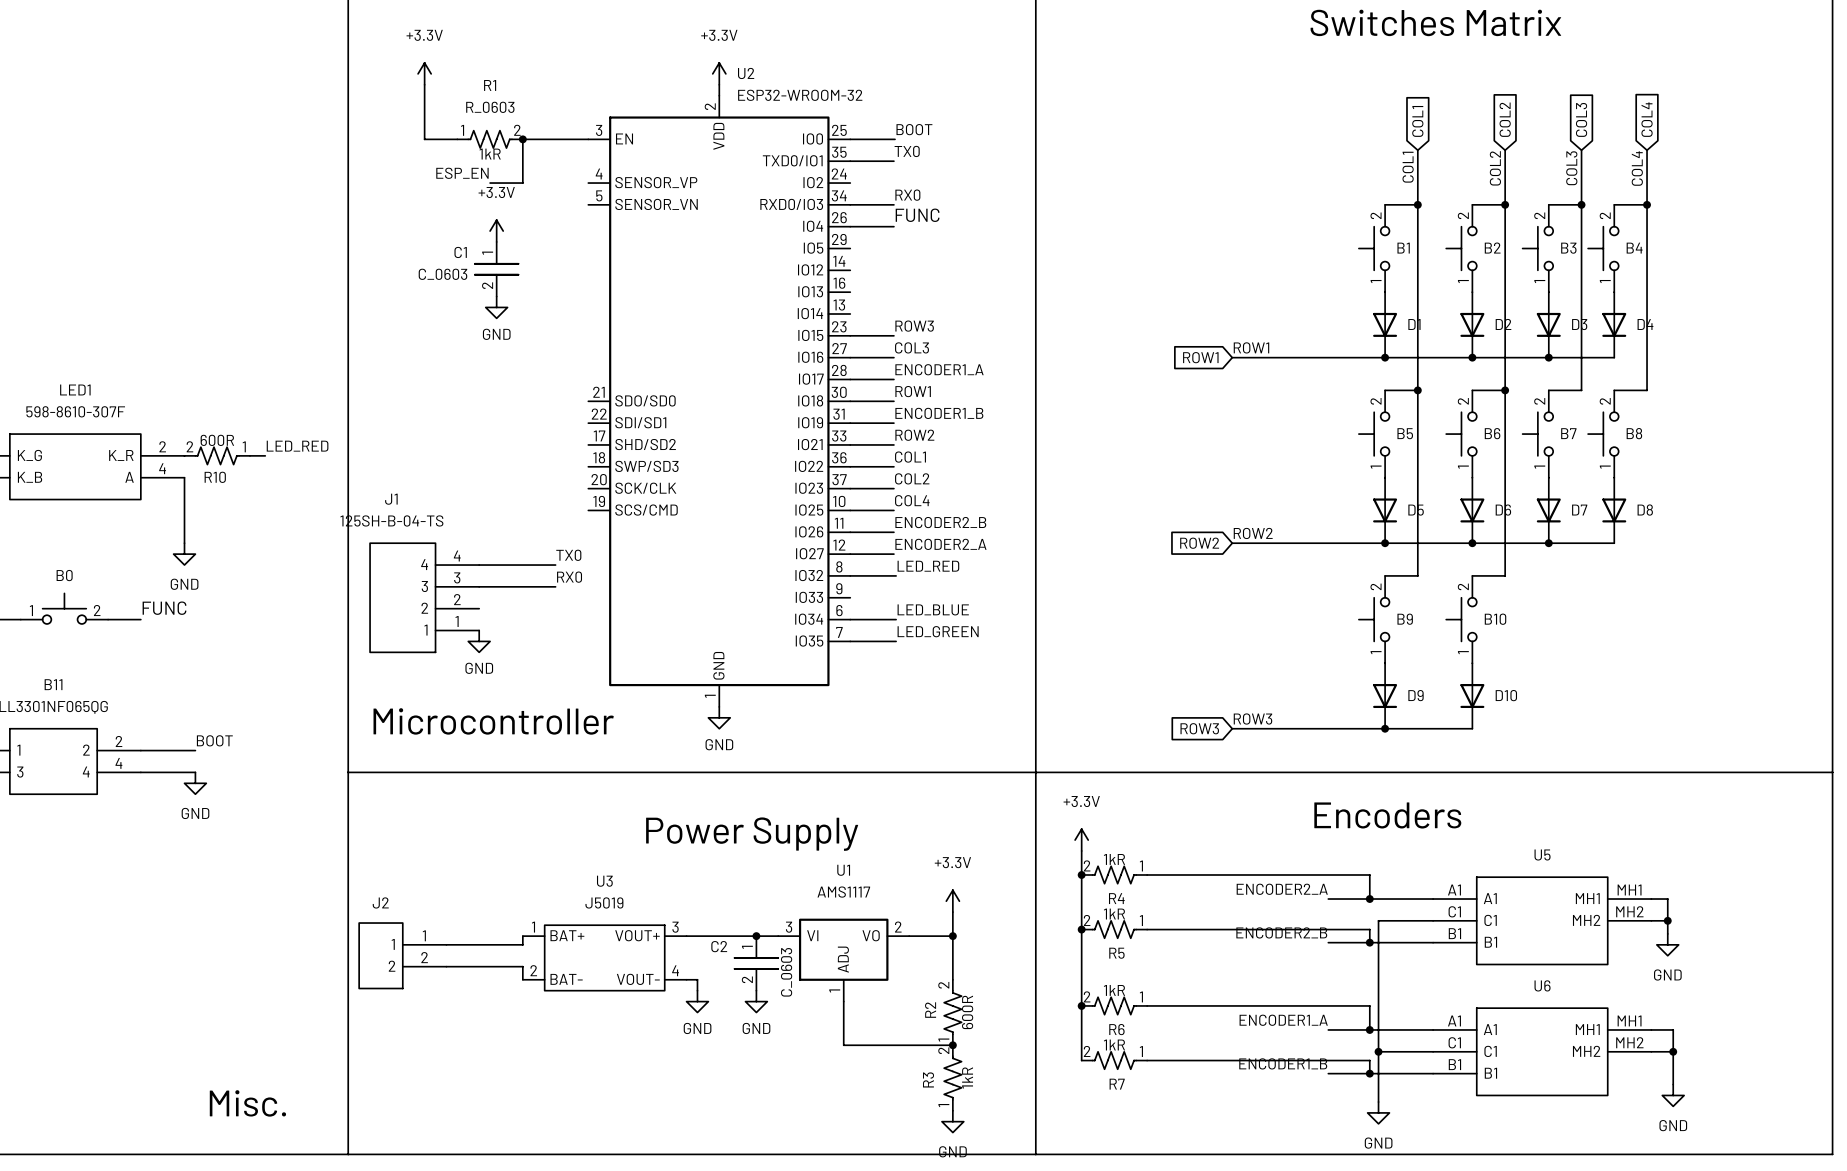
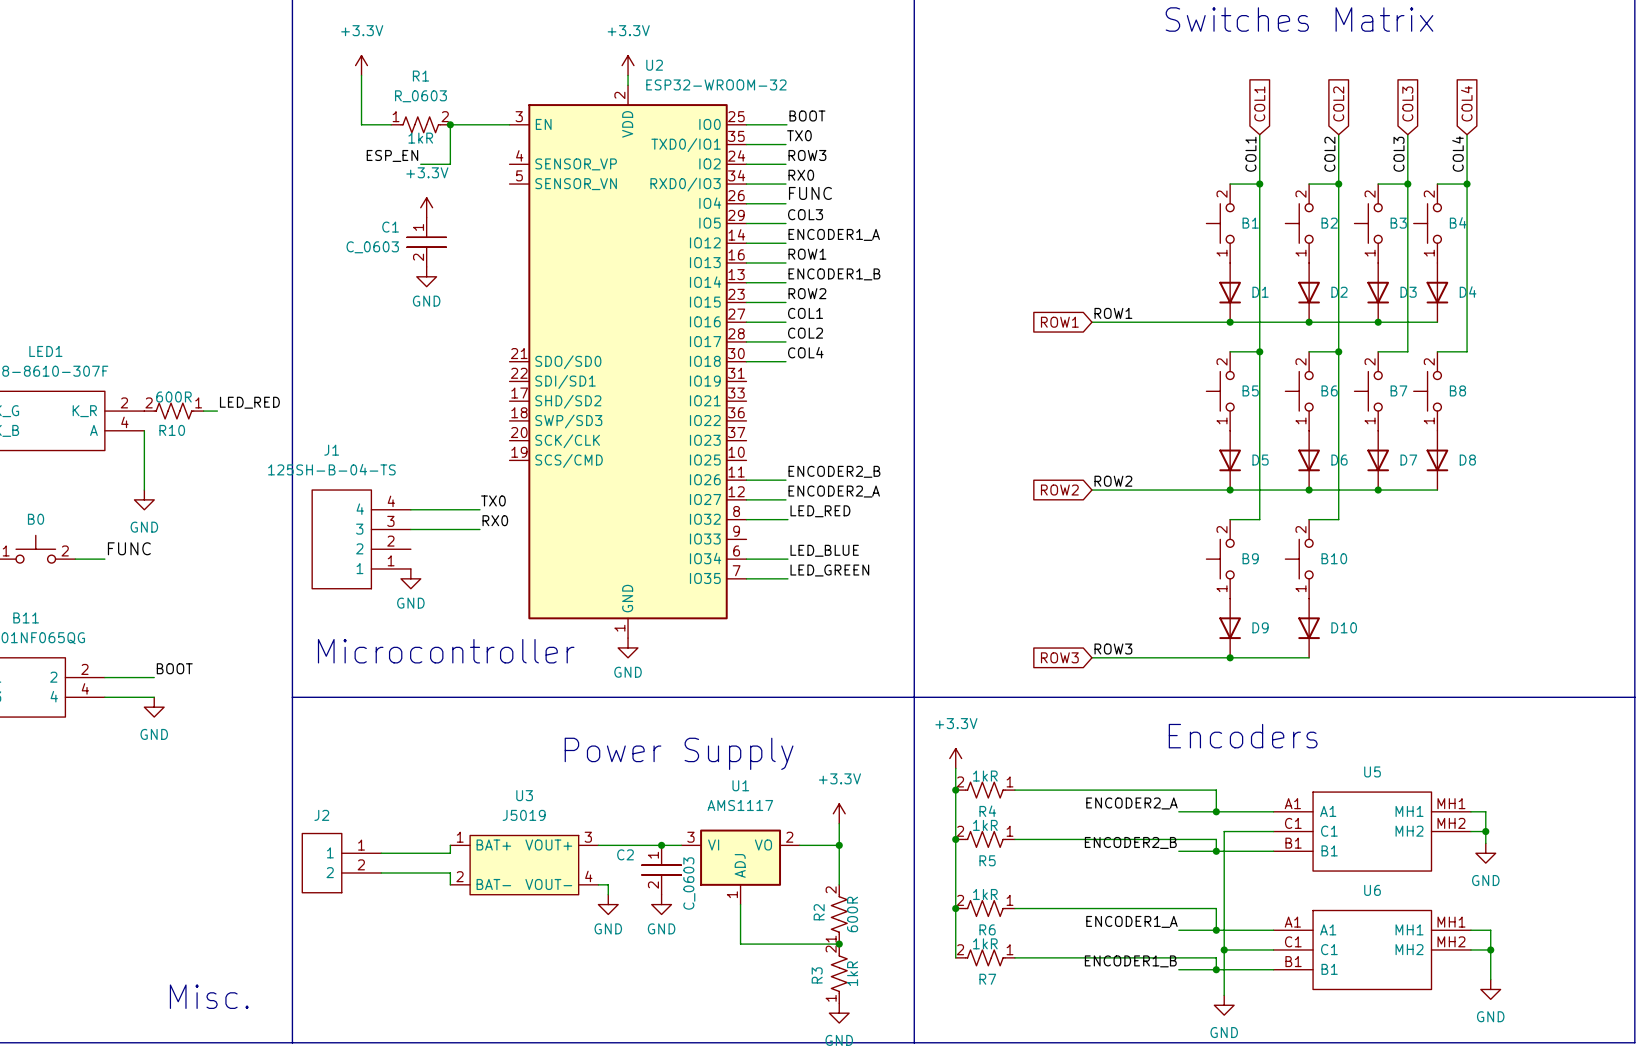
label: none -> ROW3 (807, 155)
wire: none -> (746, 164) (785, 164)
label: none -> COL3 (805, 214)
label: none -> ENCODER1_A (834, 234)
label: none -> ROW1 (807, 254)
label: ROW3 (914, 326) -> ROW2 (807, 293)
label: COL3 (912, 347) -> COL1 (805, 313)
label: ENCODER1_A (939, 369) -> COL2 (805, 333)
label: ROW1 (913, 391) -> COL4 (805, 352)
label position: ENCODER1_B (939, 413) -> ENCODER1_B (834, 274)
wire: (850, 423) (893, 423) -> (746, 223) (785, 223)
label: ROW2 (914, 435) -> none
wire: (850, 444) (893, 444) -> (746, 243) (785, 243)
label: COL1 (910, 457) -> none
wire: (850, 466) (893, 466) -> (746, 262) (785, 262)
label: COL2 (912, 478) -> none
wire: (850, 488) (893, 488) -> (746, 282) (785, 282)
label: COL4 (912, 500) -> none
wire: (850, 510) (893, 510) -> none

